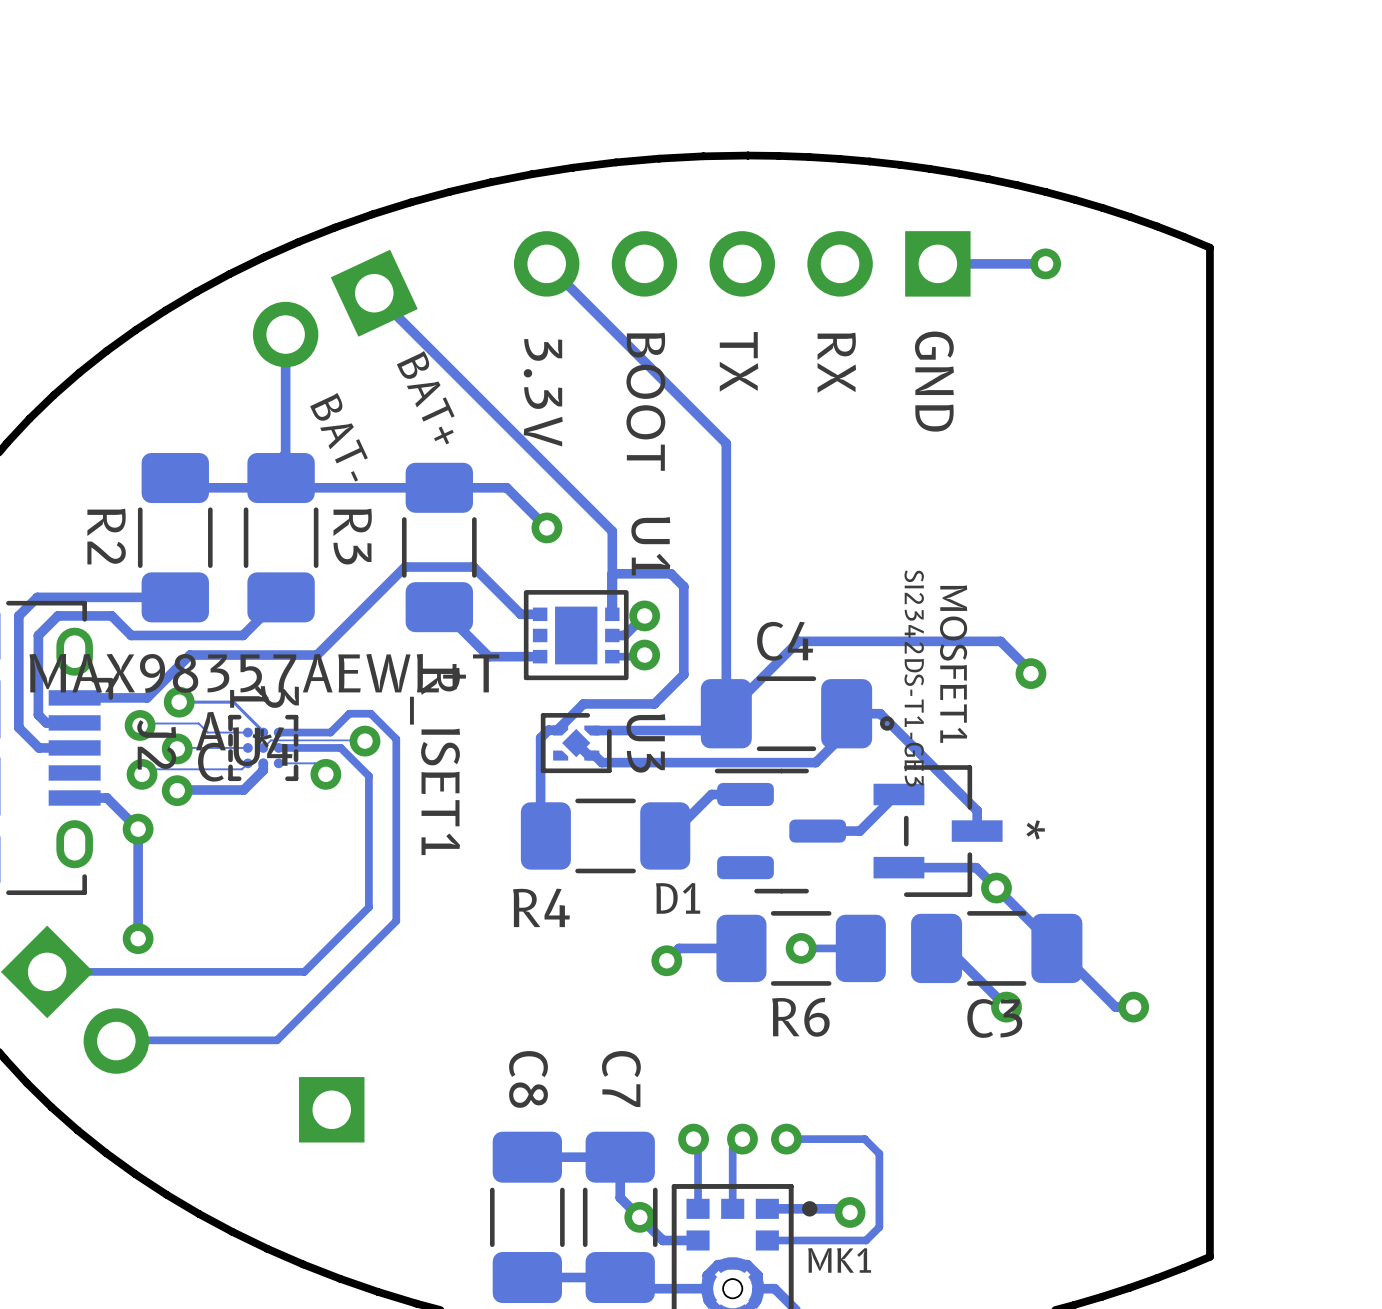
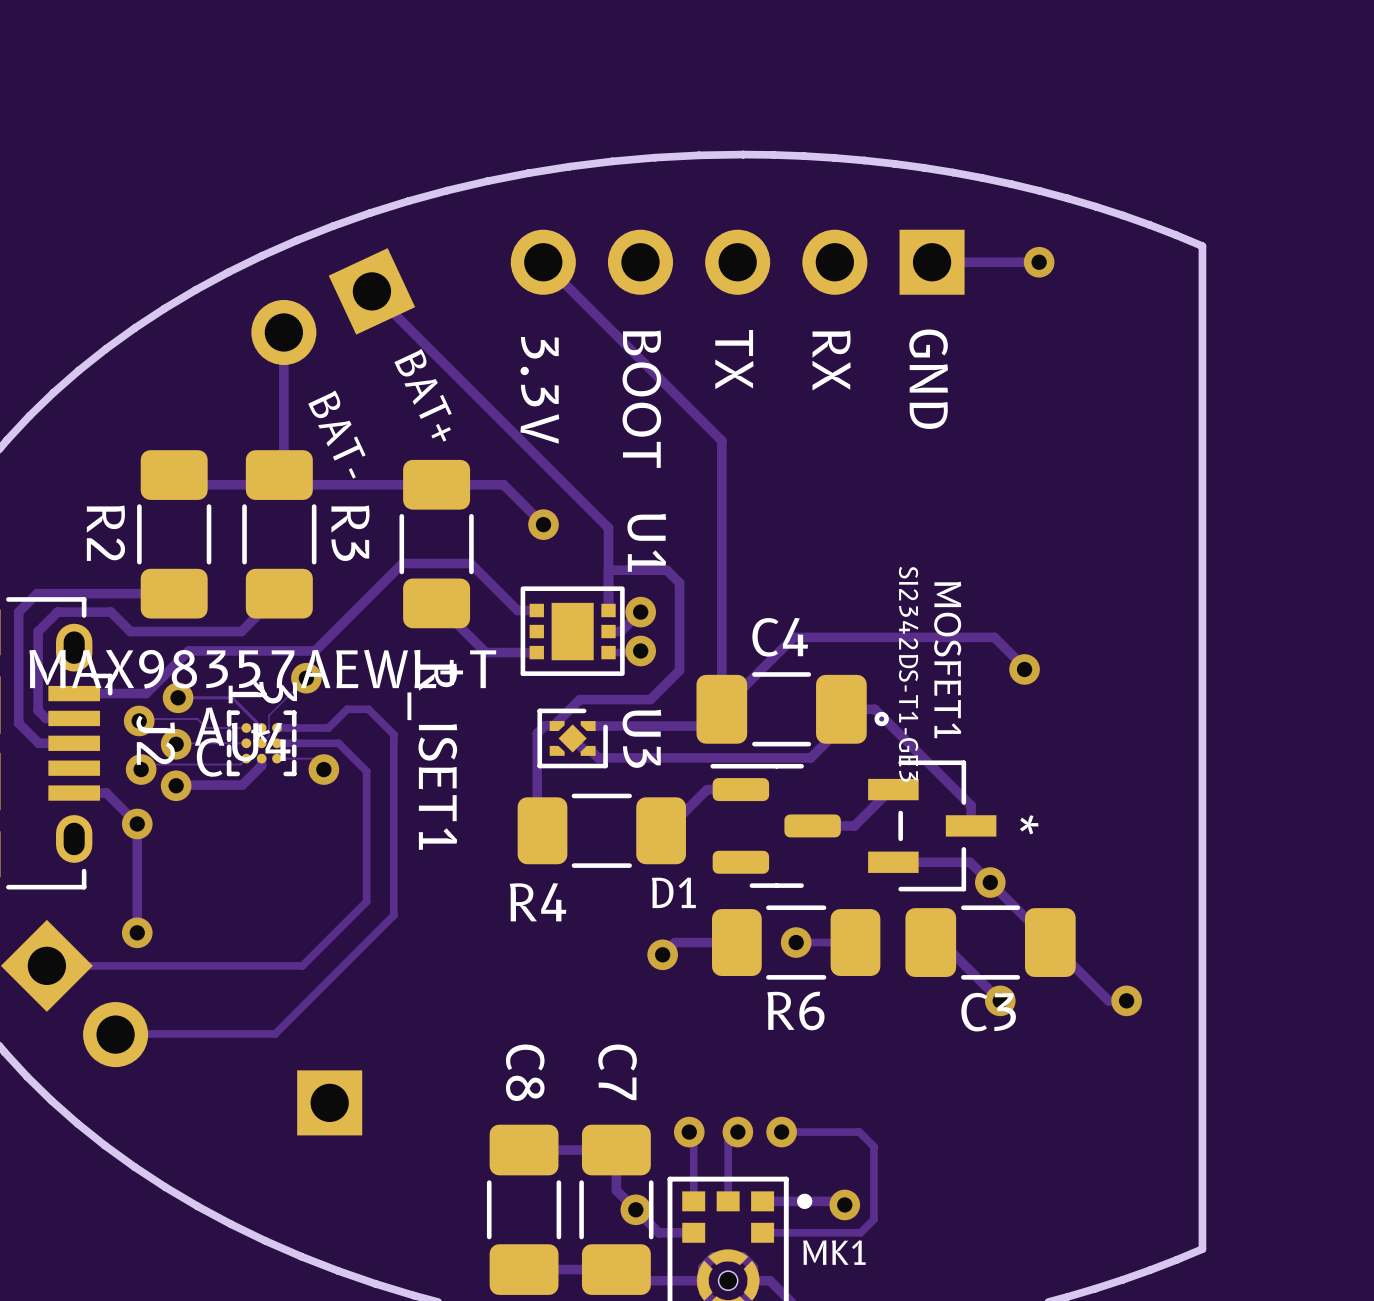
track: (270, 740) (365, 741) -> (269, 735) (269, 715) (306, 678)
via position: (365, 741) -> (306, 678)

